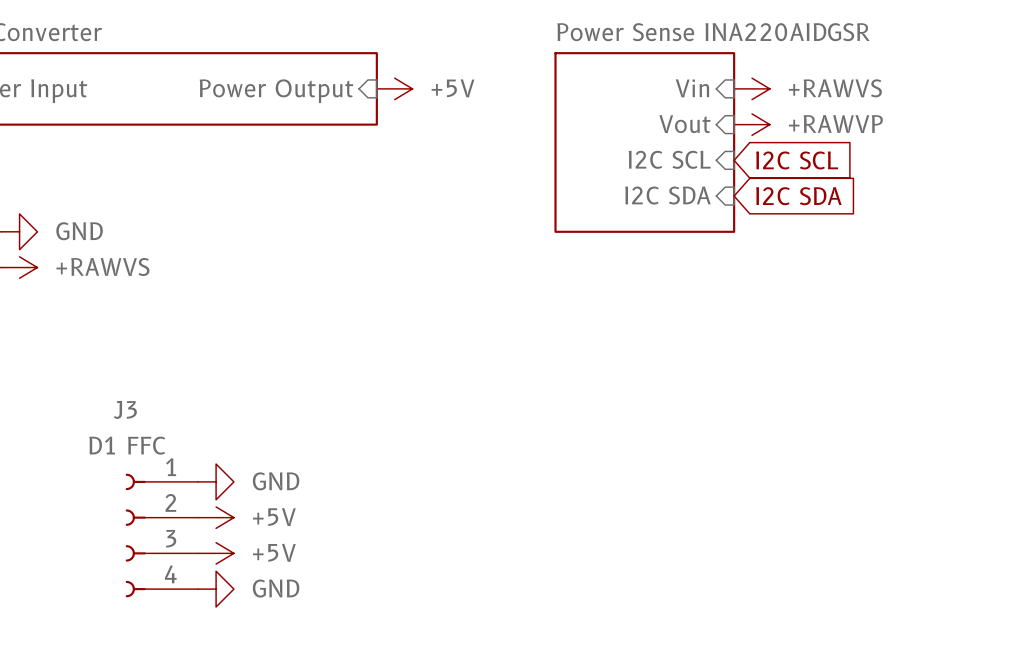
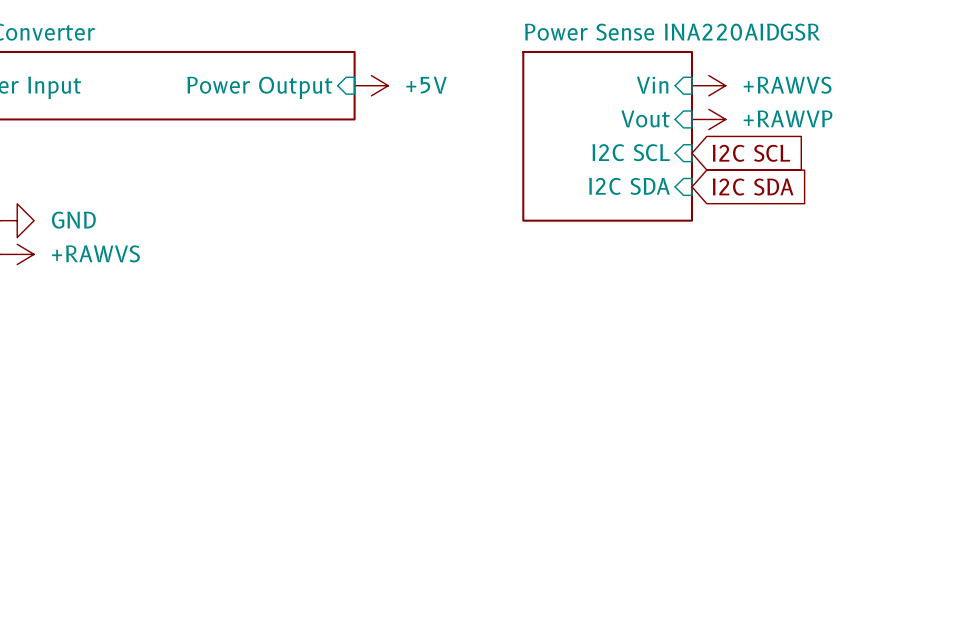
power symbol: GND (216, 481) -> none
power symbol: +5V (216, 517) -> none
J3: D1 FFC (161, 535) -> none
power symbol: +5V (216, 553) -> none
power symbol: GND (216, 589) -> none

